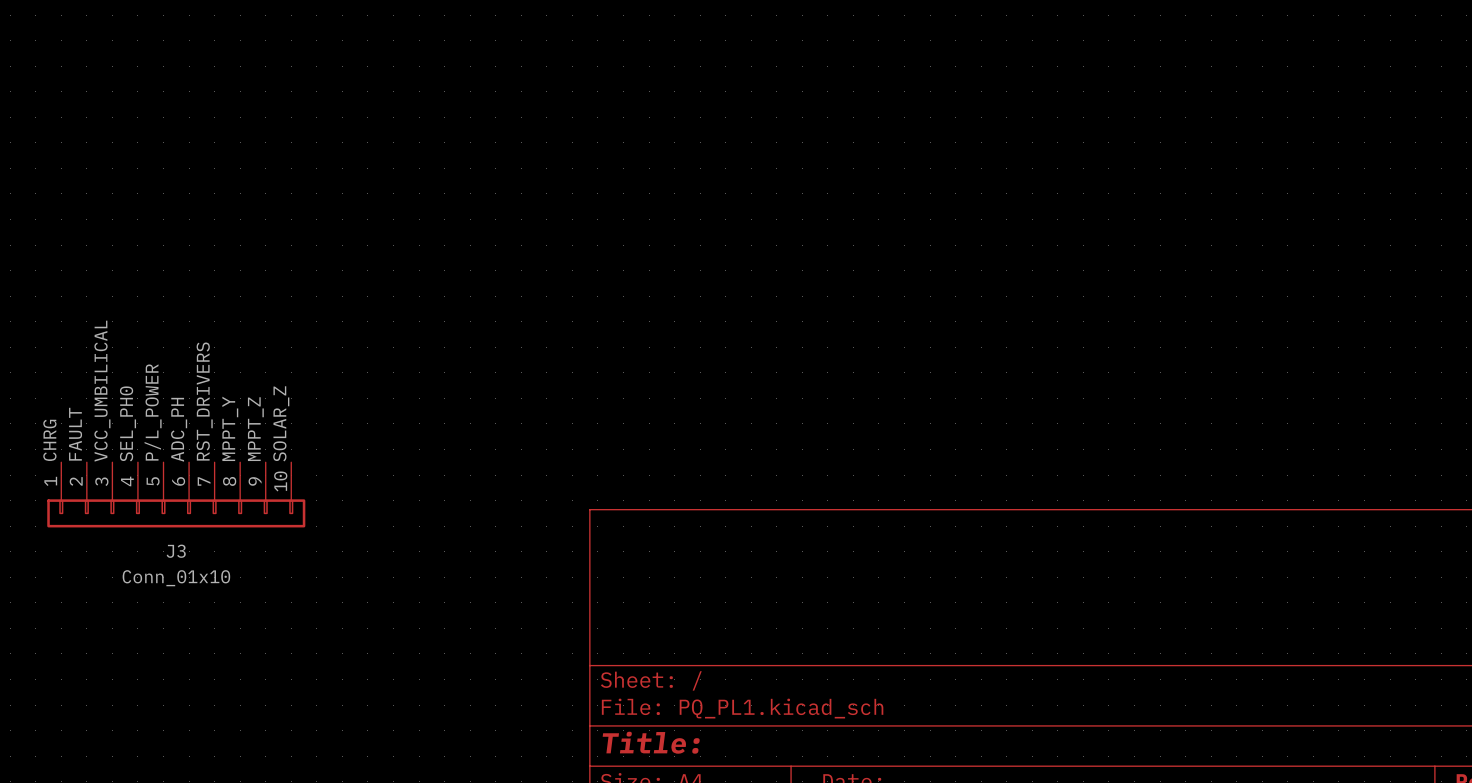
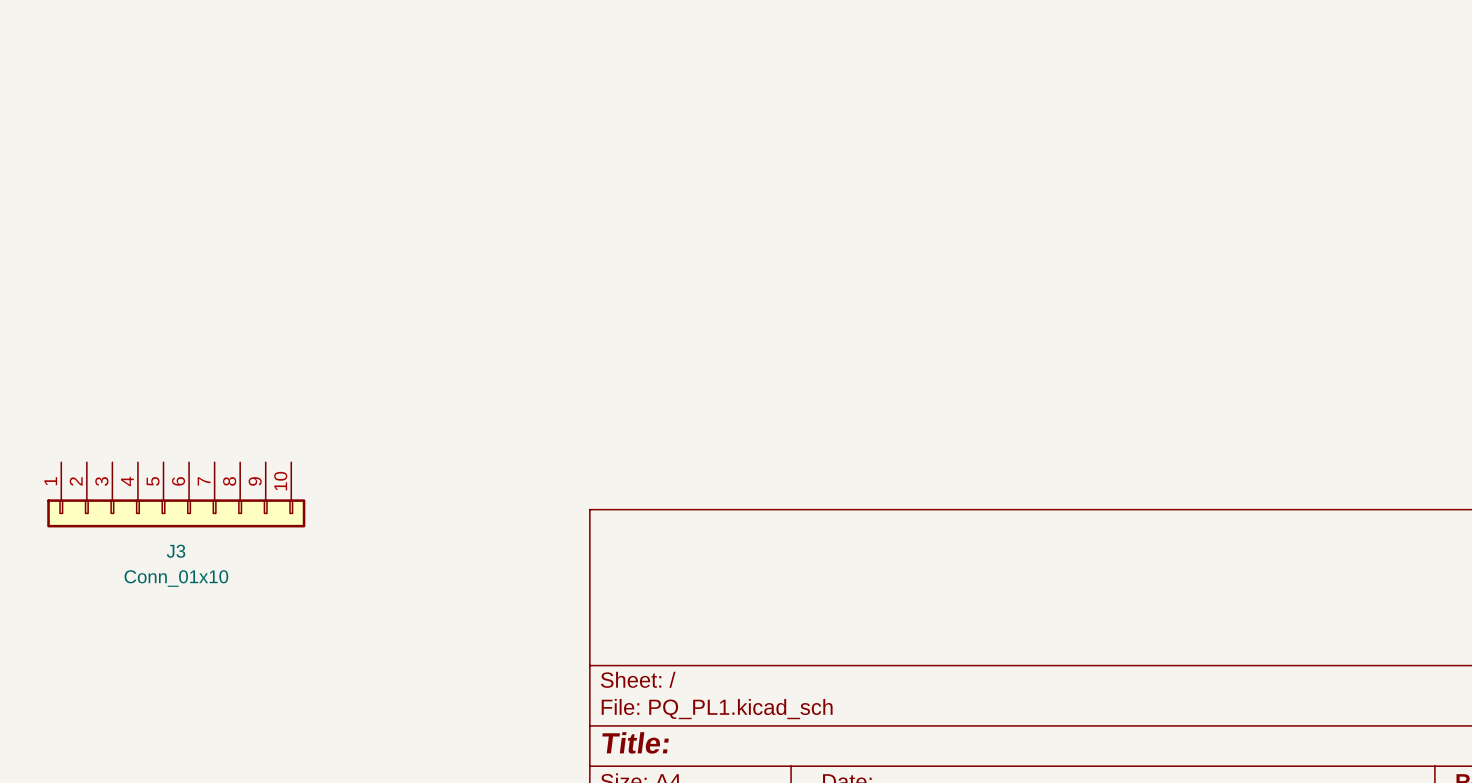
label: VCC_UMBILICAL (102, 391) -> none
label: RST_DRIVERS (204, 401) -> none
label: P/L_POWER (153, 412) -> none
label: SEL_PH0 (127, 423) -> none
label: SOLAR_Z (281, 423) -> none
label: MPPT_Y (230, 428) -> none
label: ADC_PH (179, 429) -> none
label: MPPT_Z (255, 429) -> none
label: FAULT (75, 434) -> none
label: CHRG (49, 440) -> none

